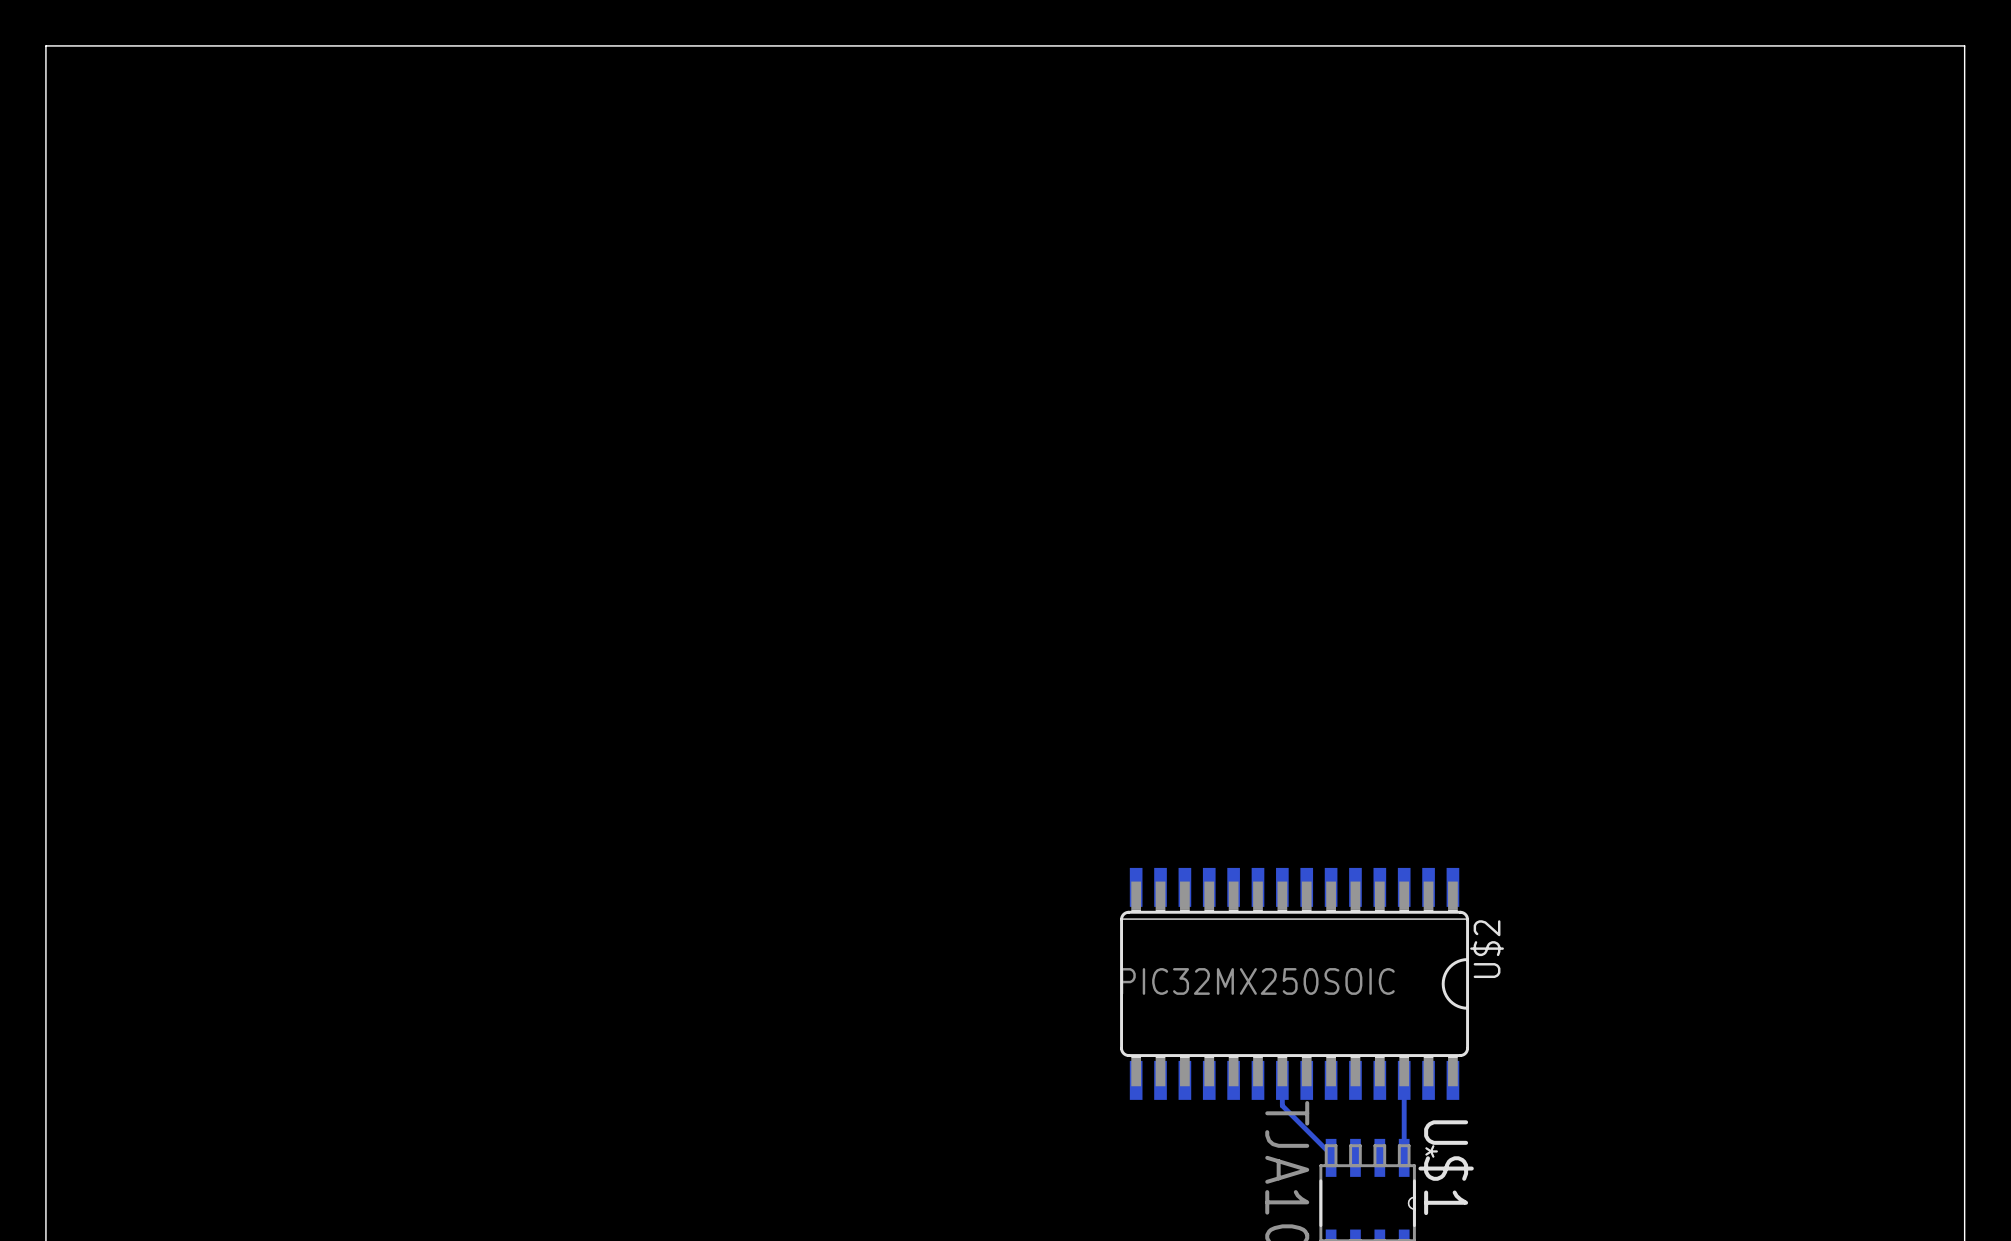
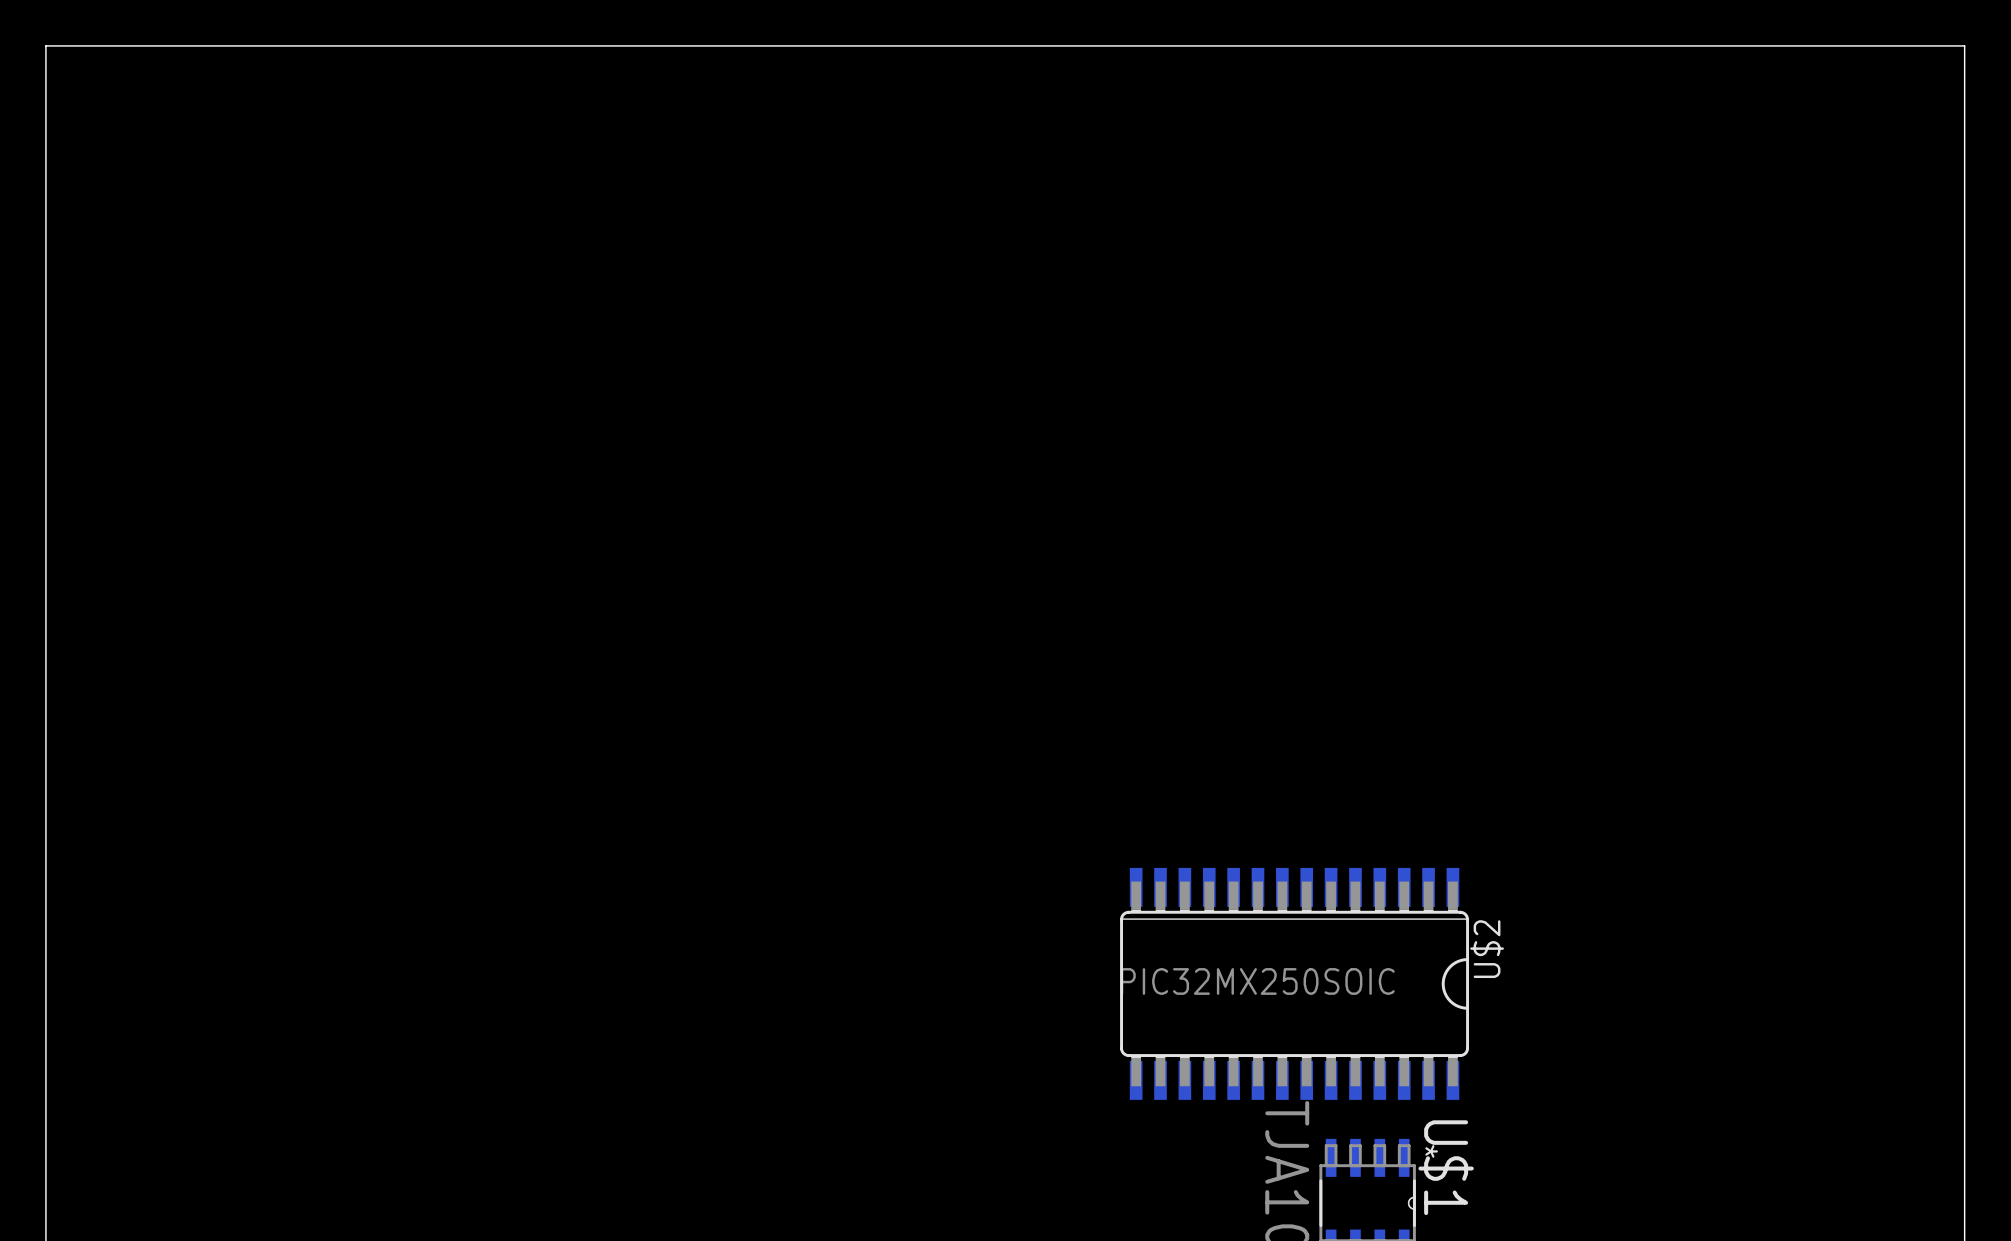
bottom track: (1282, 1080) (1282, 1105) (1331, 1154) (1331, 1157) -> none
bottom track: (1404, 1080) (1404, 1157) -> none

